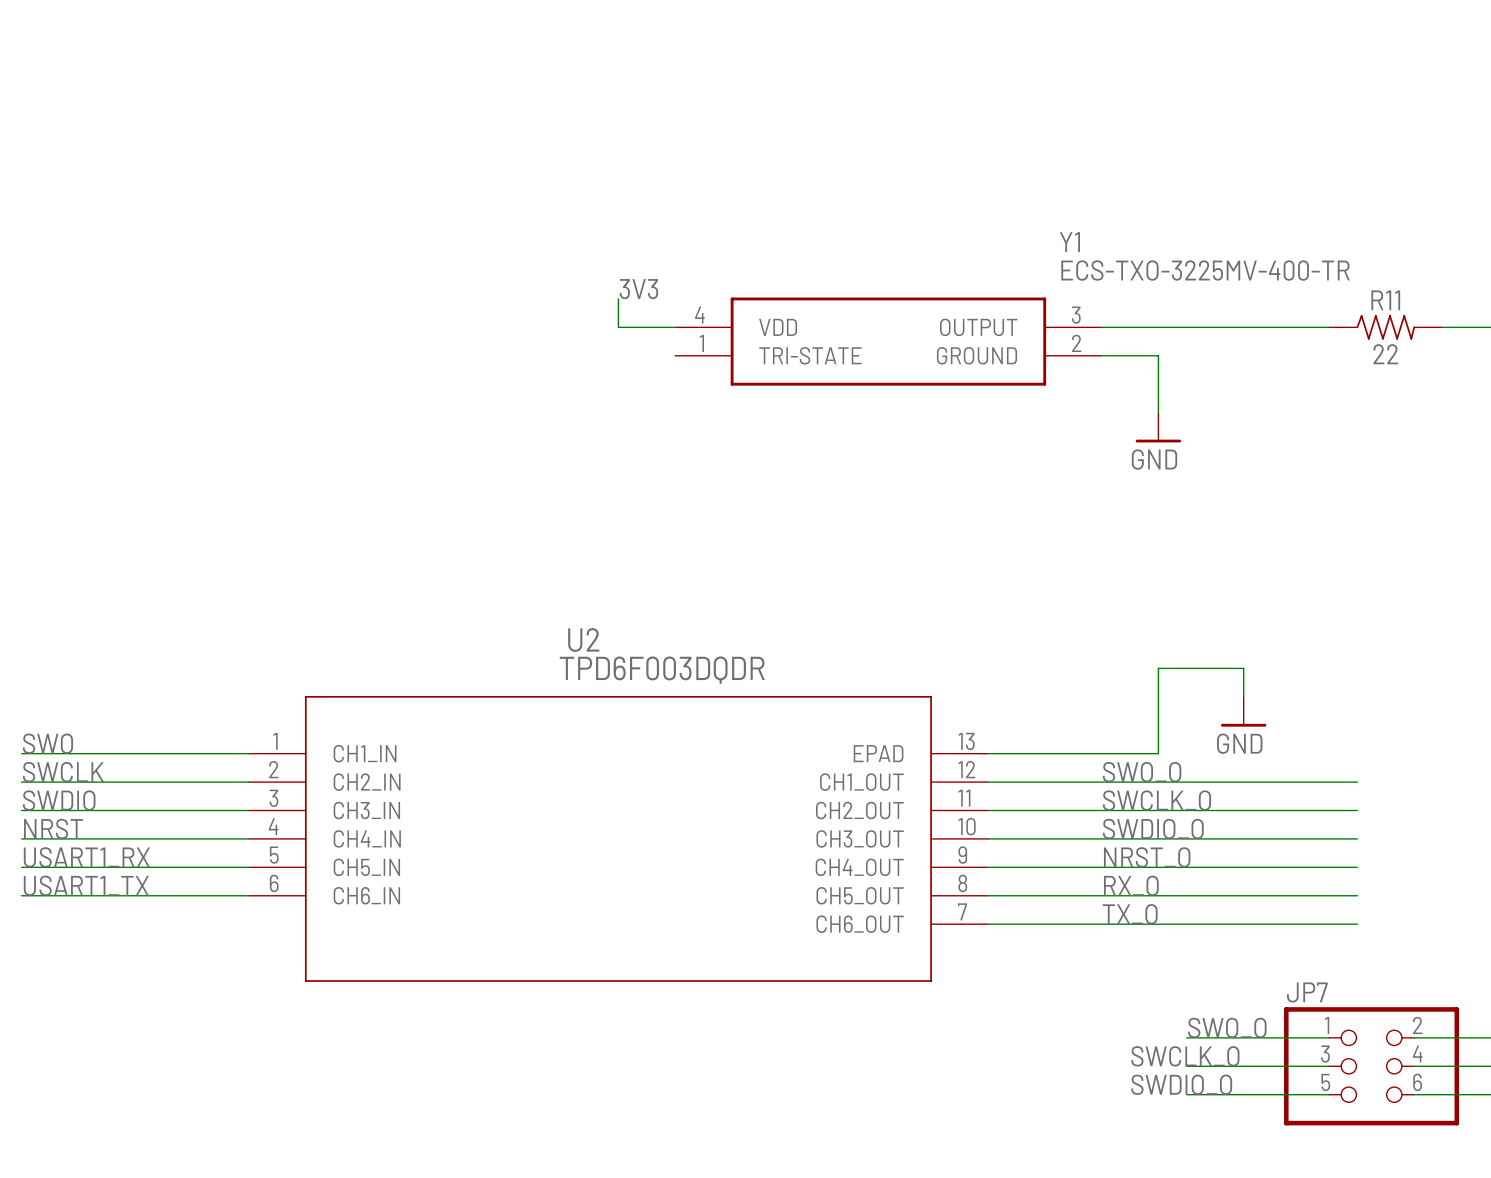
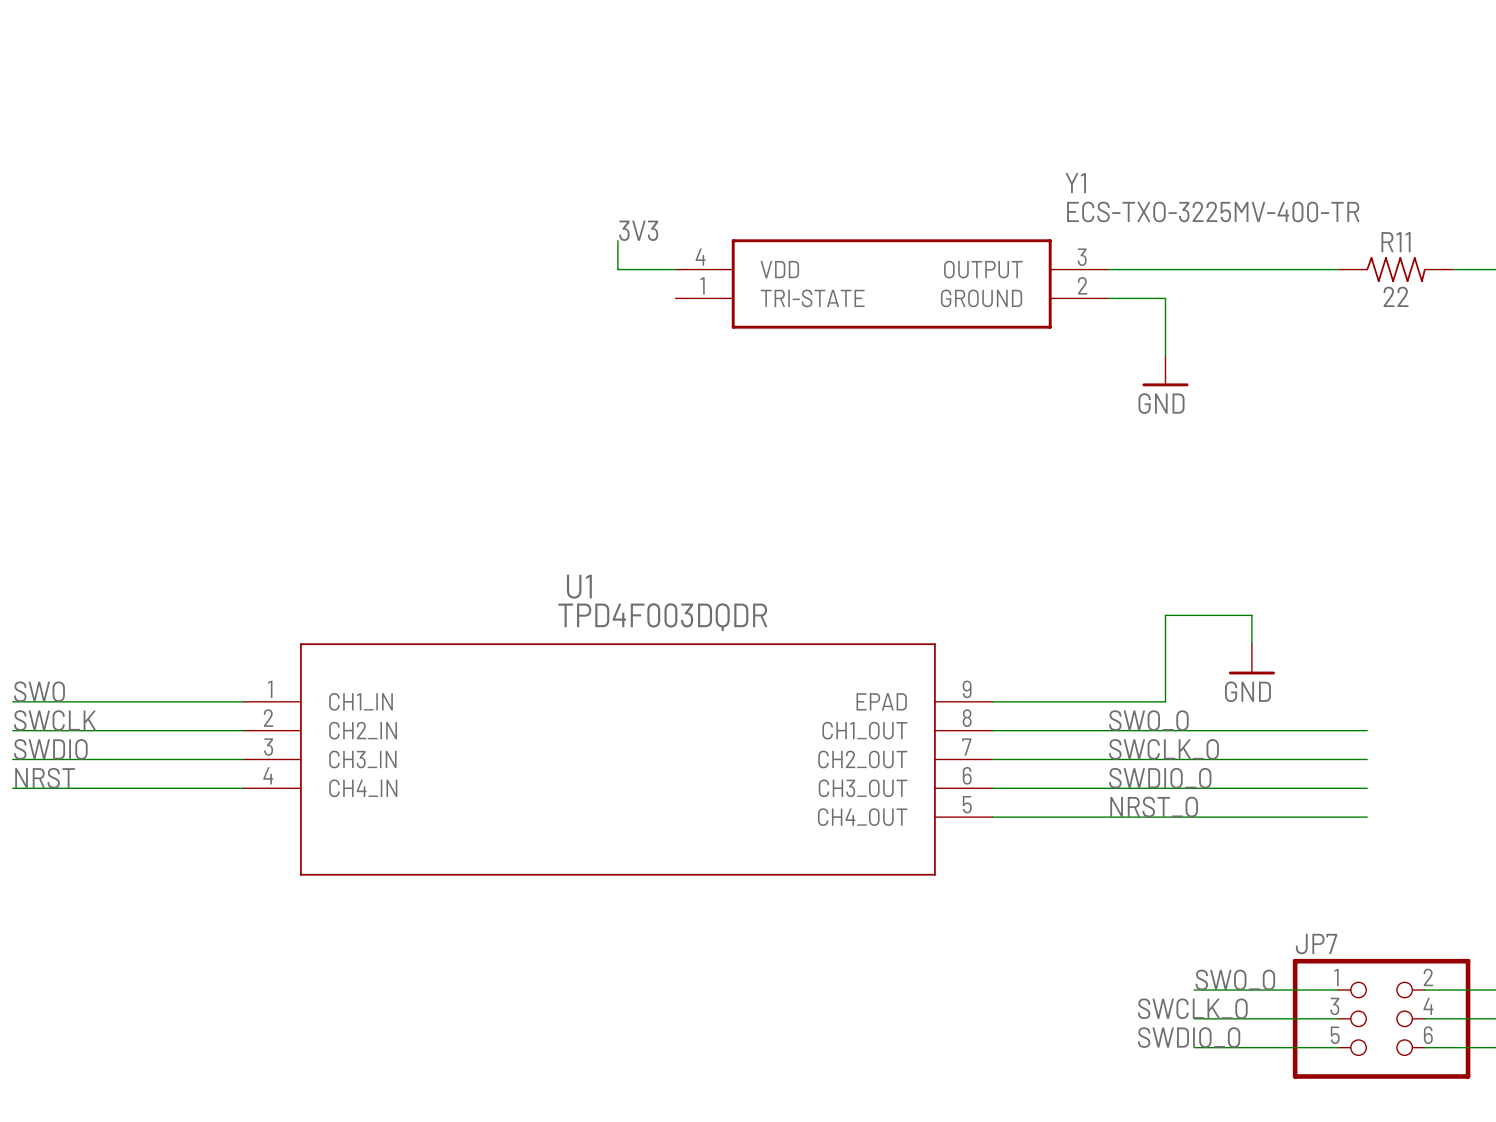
U1: none -> TPD4F003DQDR (617, 759)
U2: TPD6F003DQDR (618, 838) -> none
label: USART1_RX (86, 857) -> none
wire: (21, 867) (248, 867) -> none
label: USART1_TX (86, 885) -> none
label: RX_O (1131, 885) -> none
wire: (21, 895) (248, 895) -> none
wire: (987, 895) (1357, 895) -> none
label: TX_O (1130, 914) -> none
wire: (987, 924) (1357, 924) -> none

